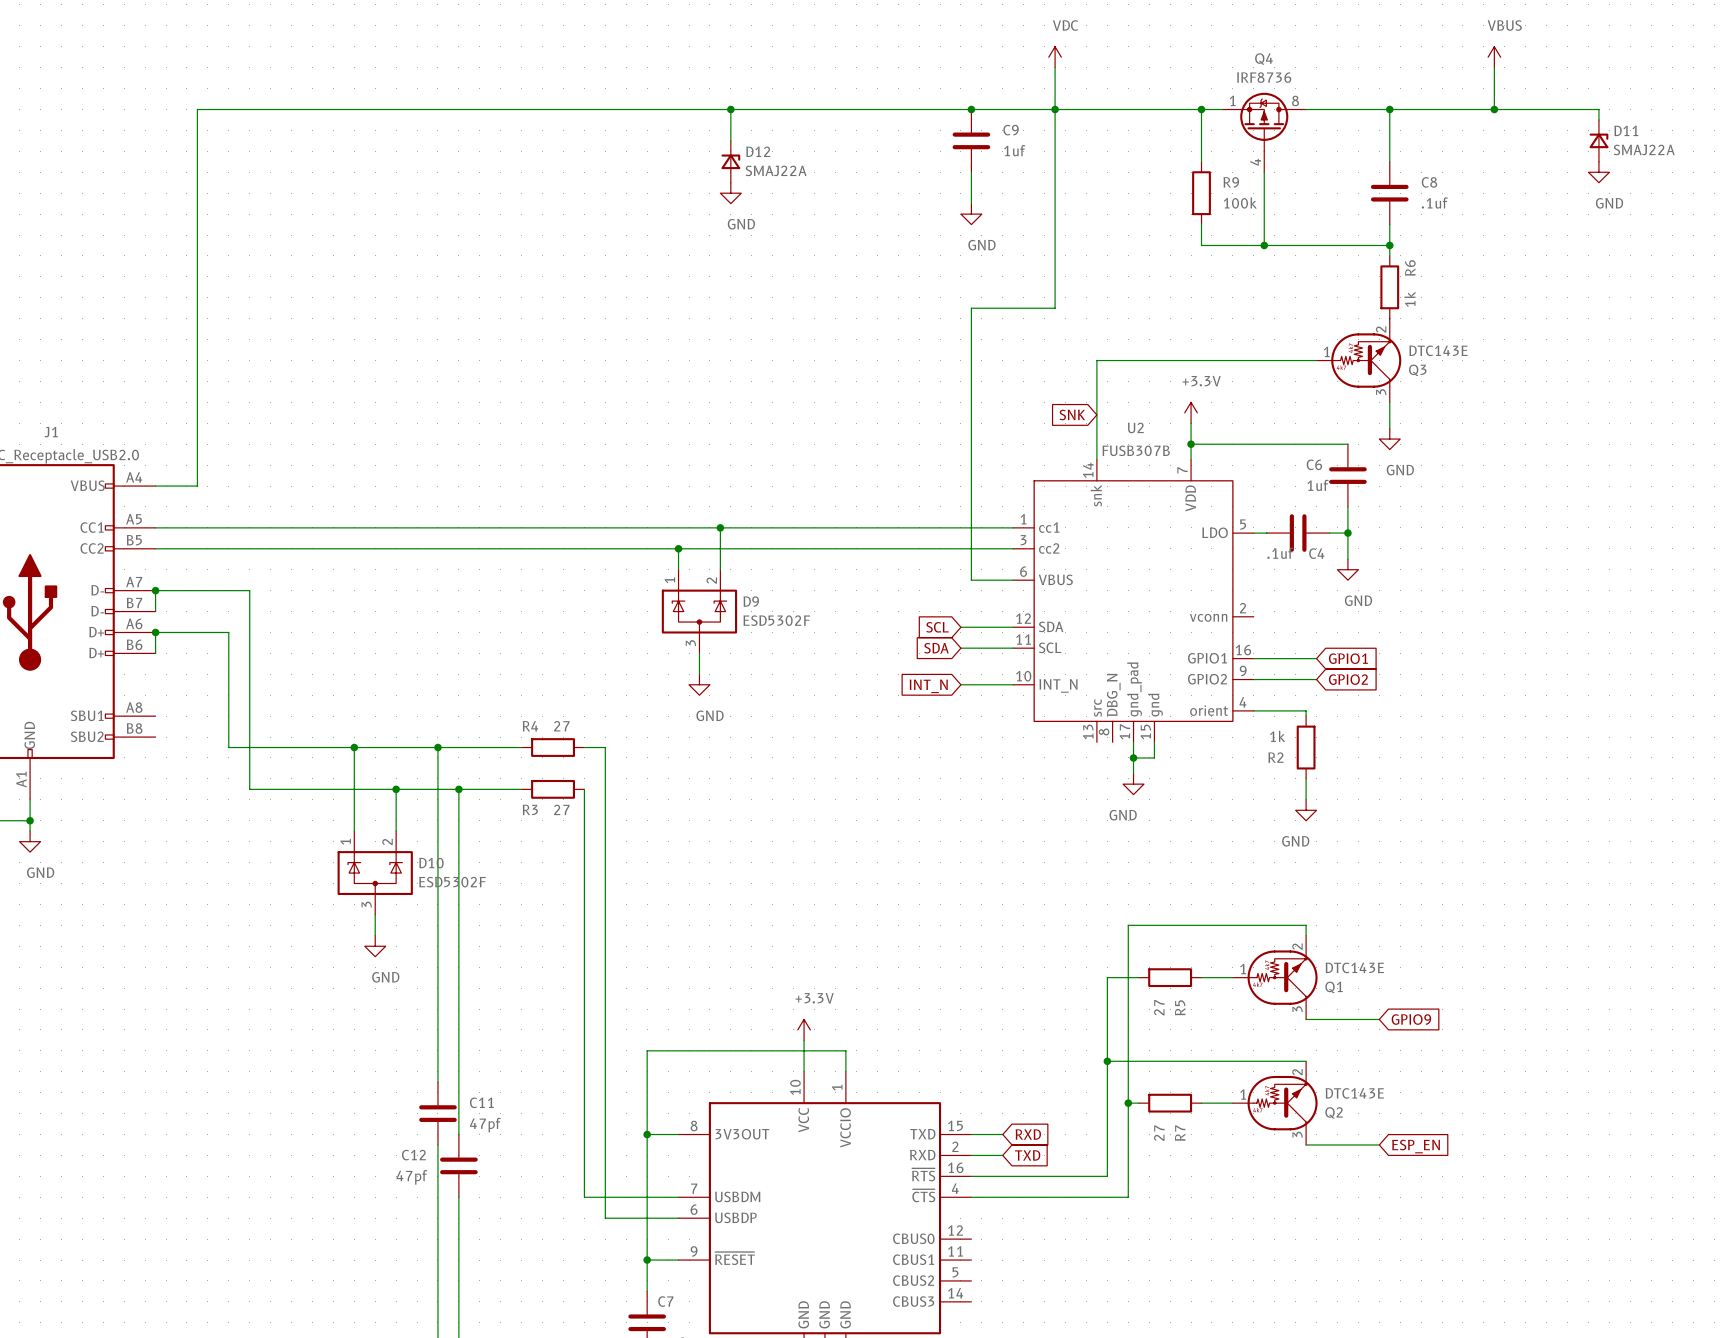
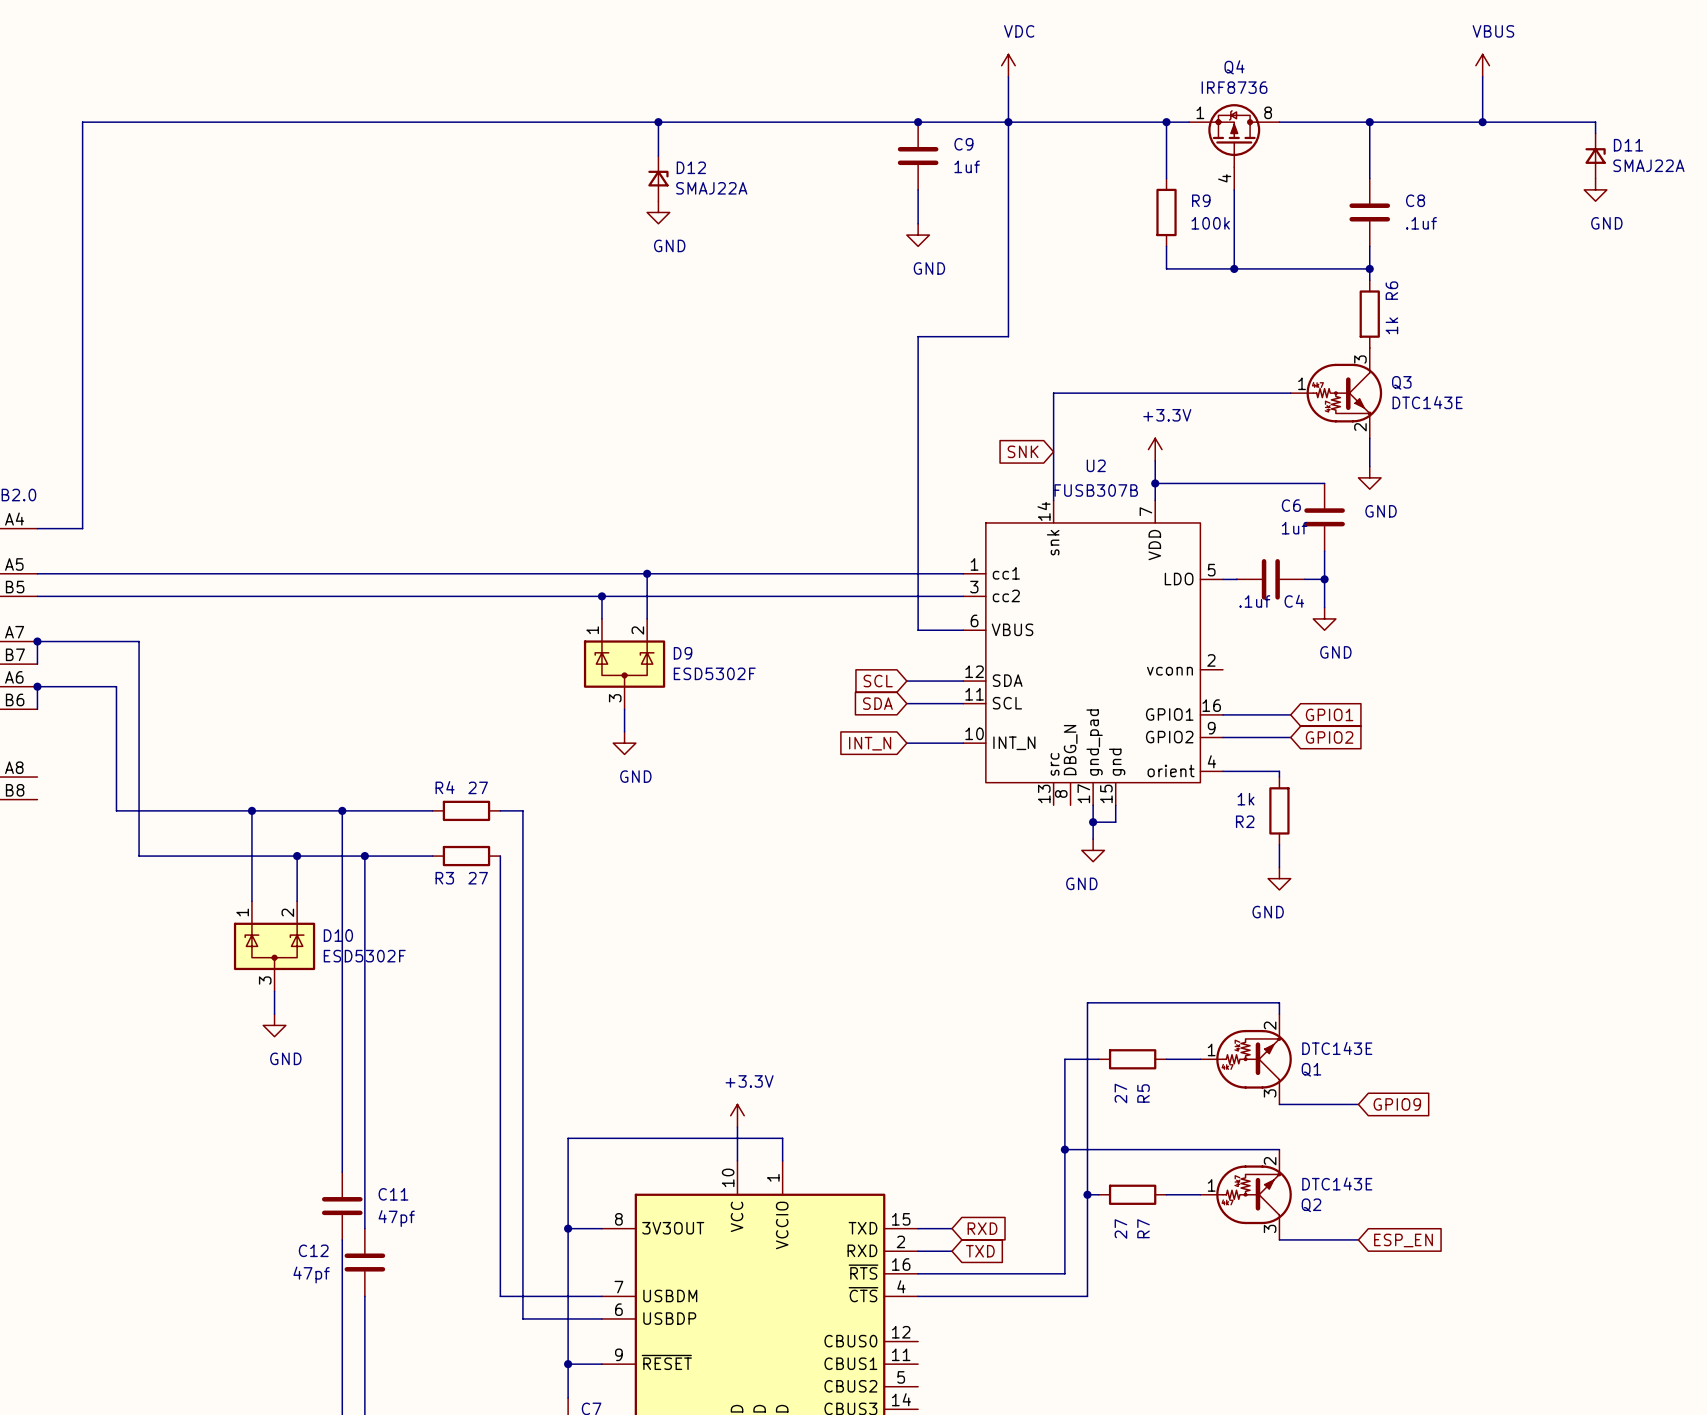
Q3 flip: as is (1366, 360) -> up-down (1344, 393)

